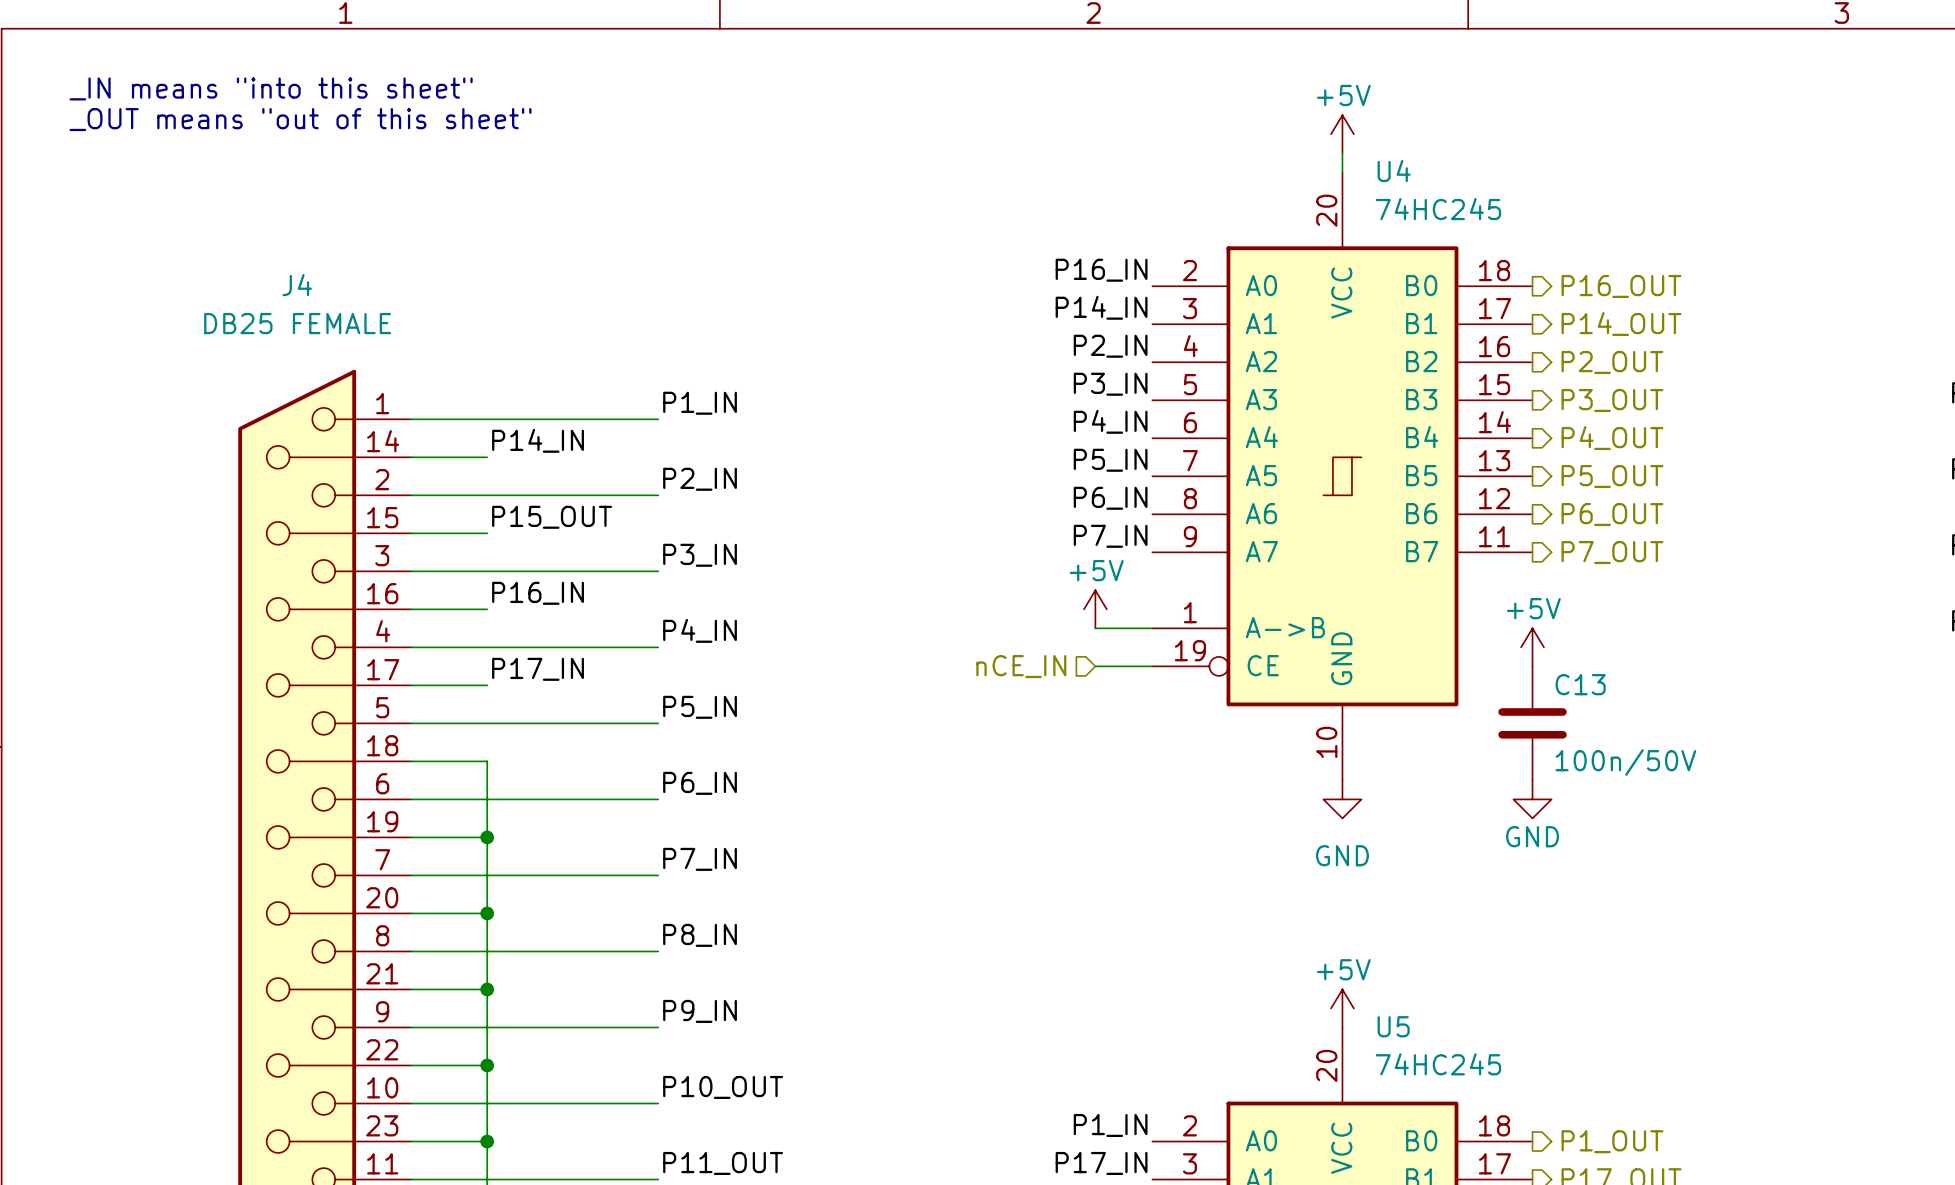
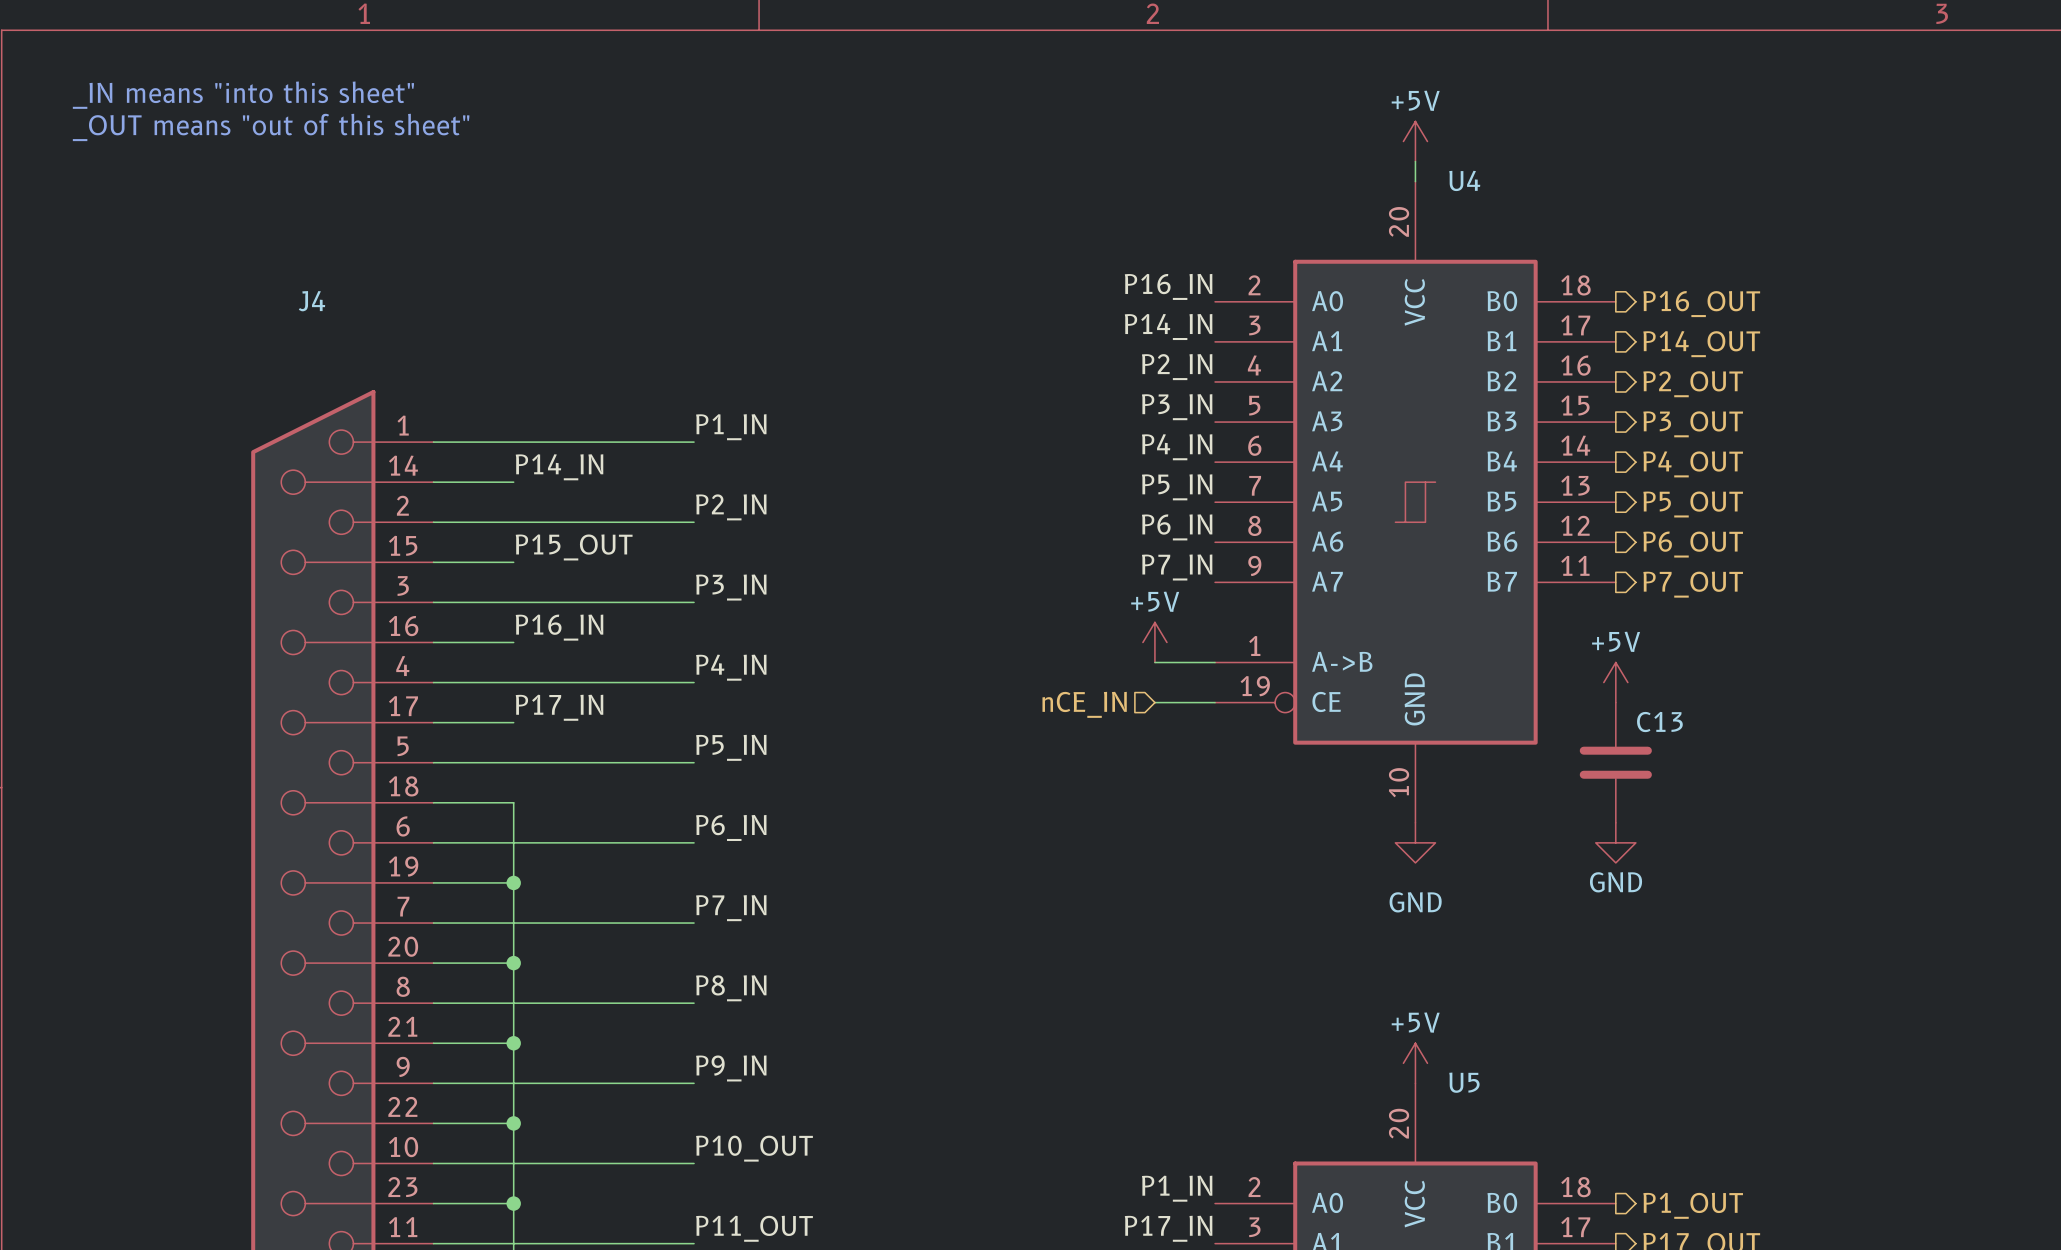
U4 value: 74HC245 (1438, 209) -> none
J4 value: DB25 FEMALE (297, 323) -> none
C13 value: 100n/50V (1625, 762) -> none
U5 value: 74HC245 (1438, 1064) -> none

